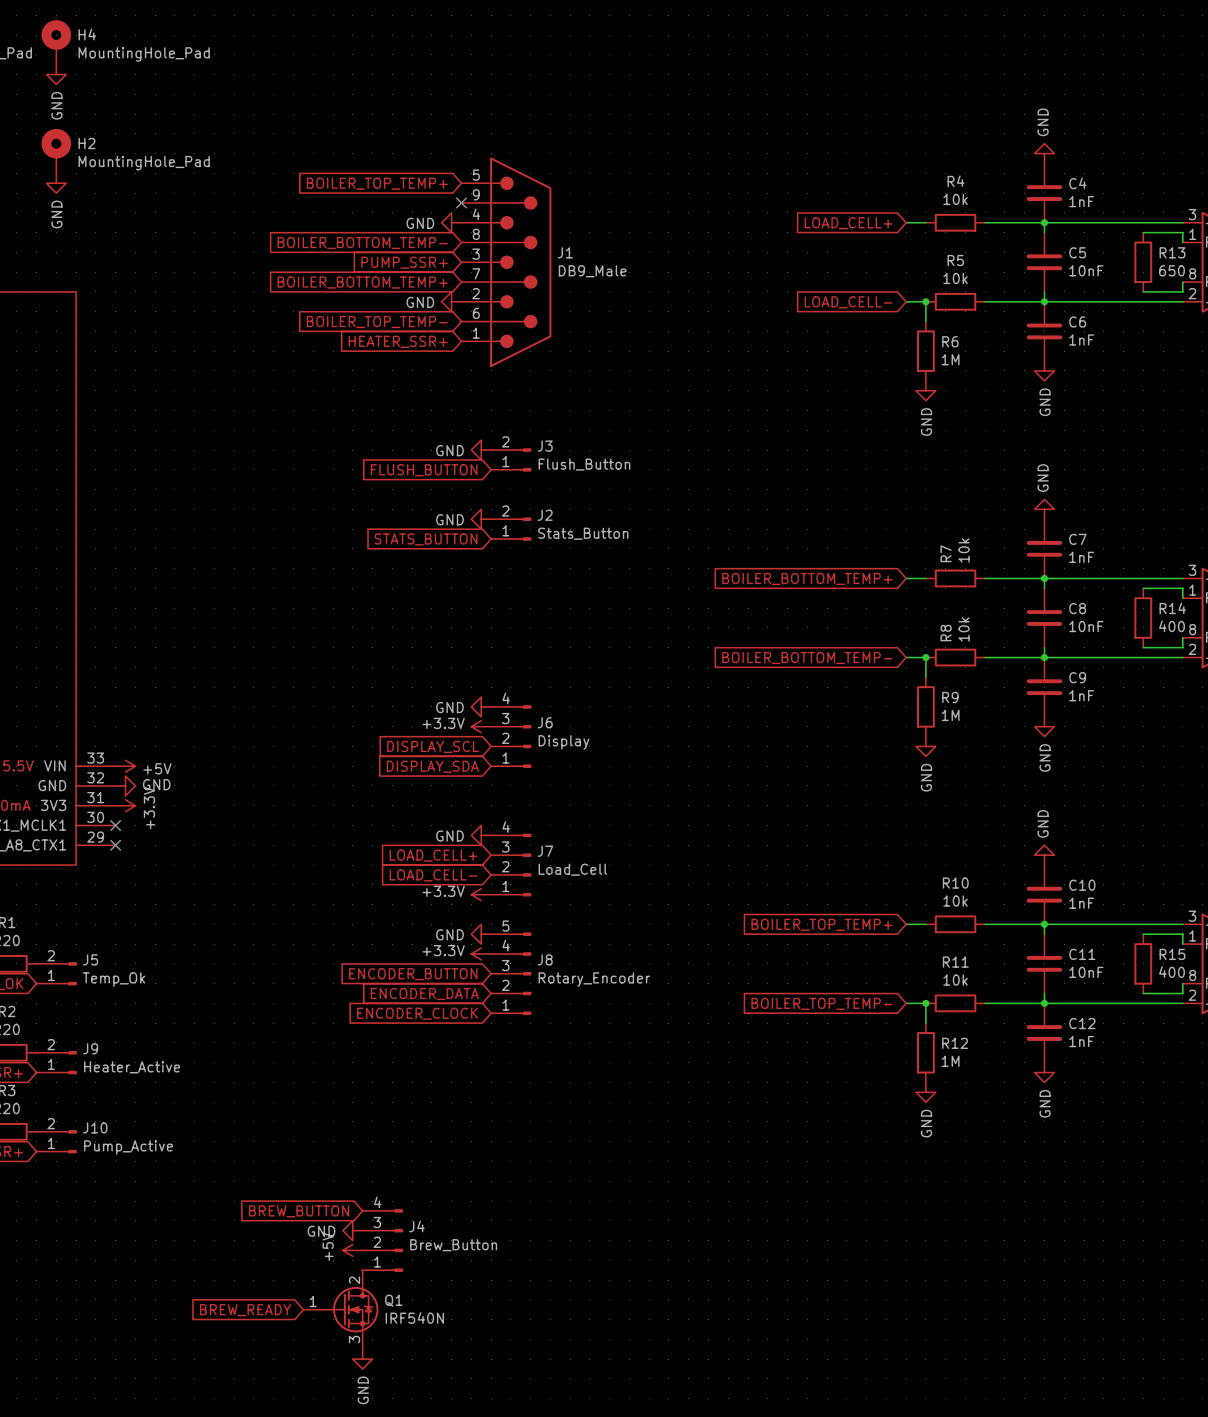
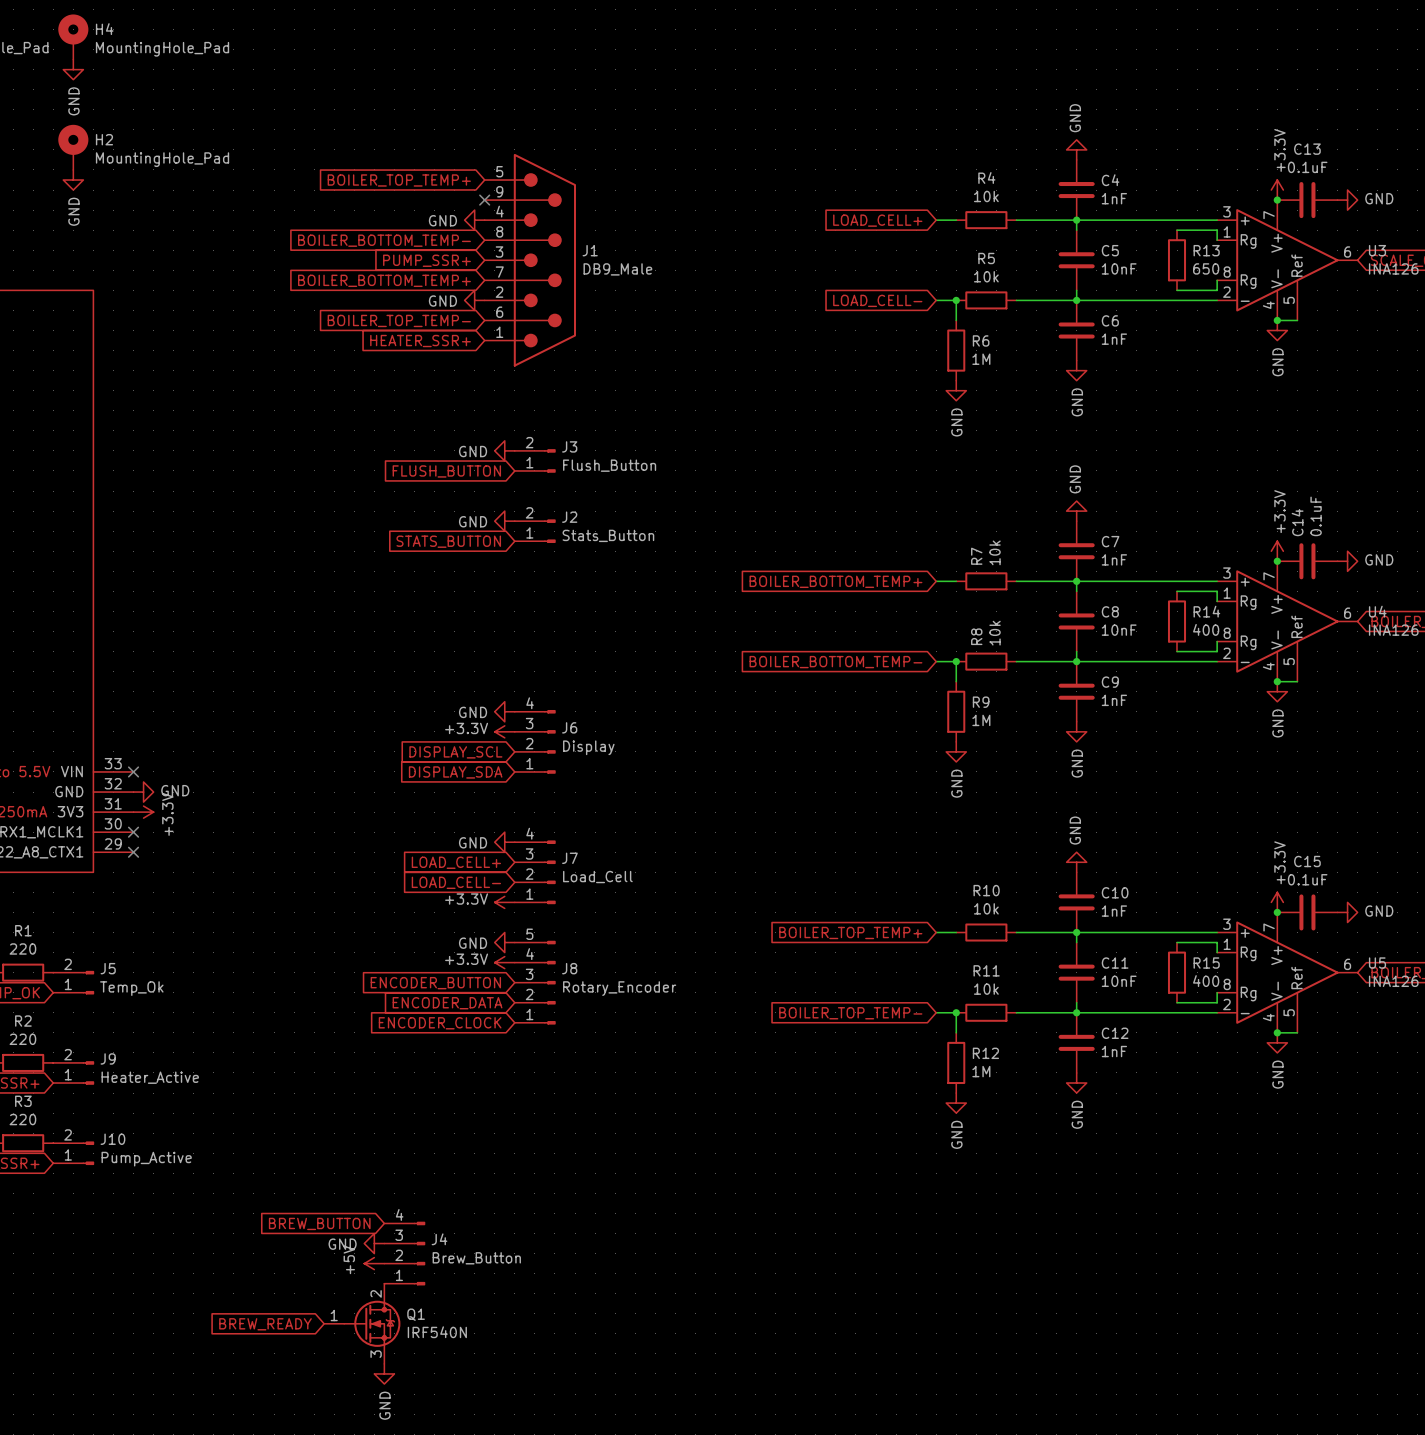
no-connect mark: none -> (133, 771)
power symbol: +5V (125, 766) -> none

